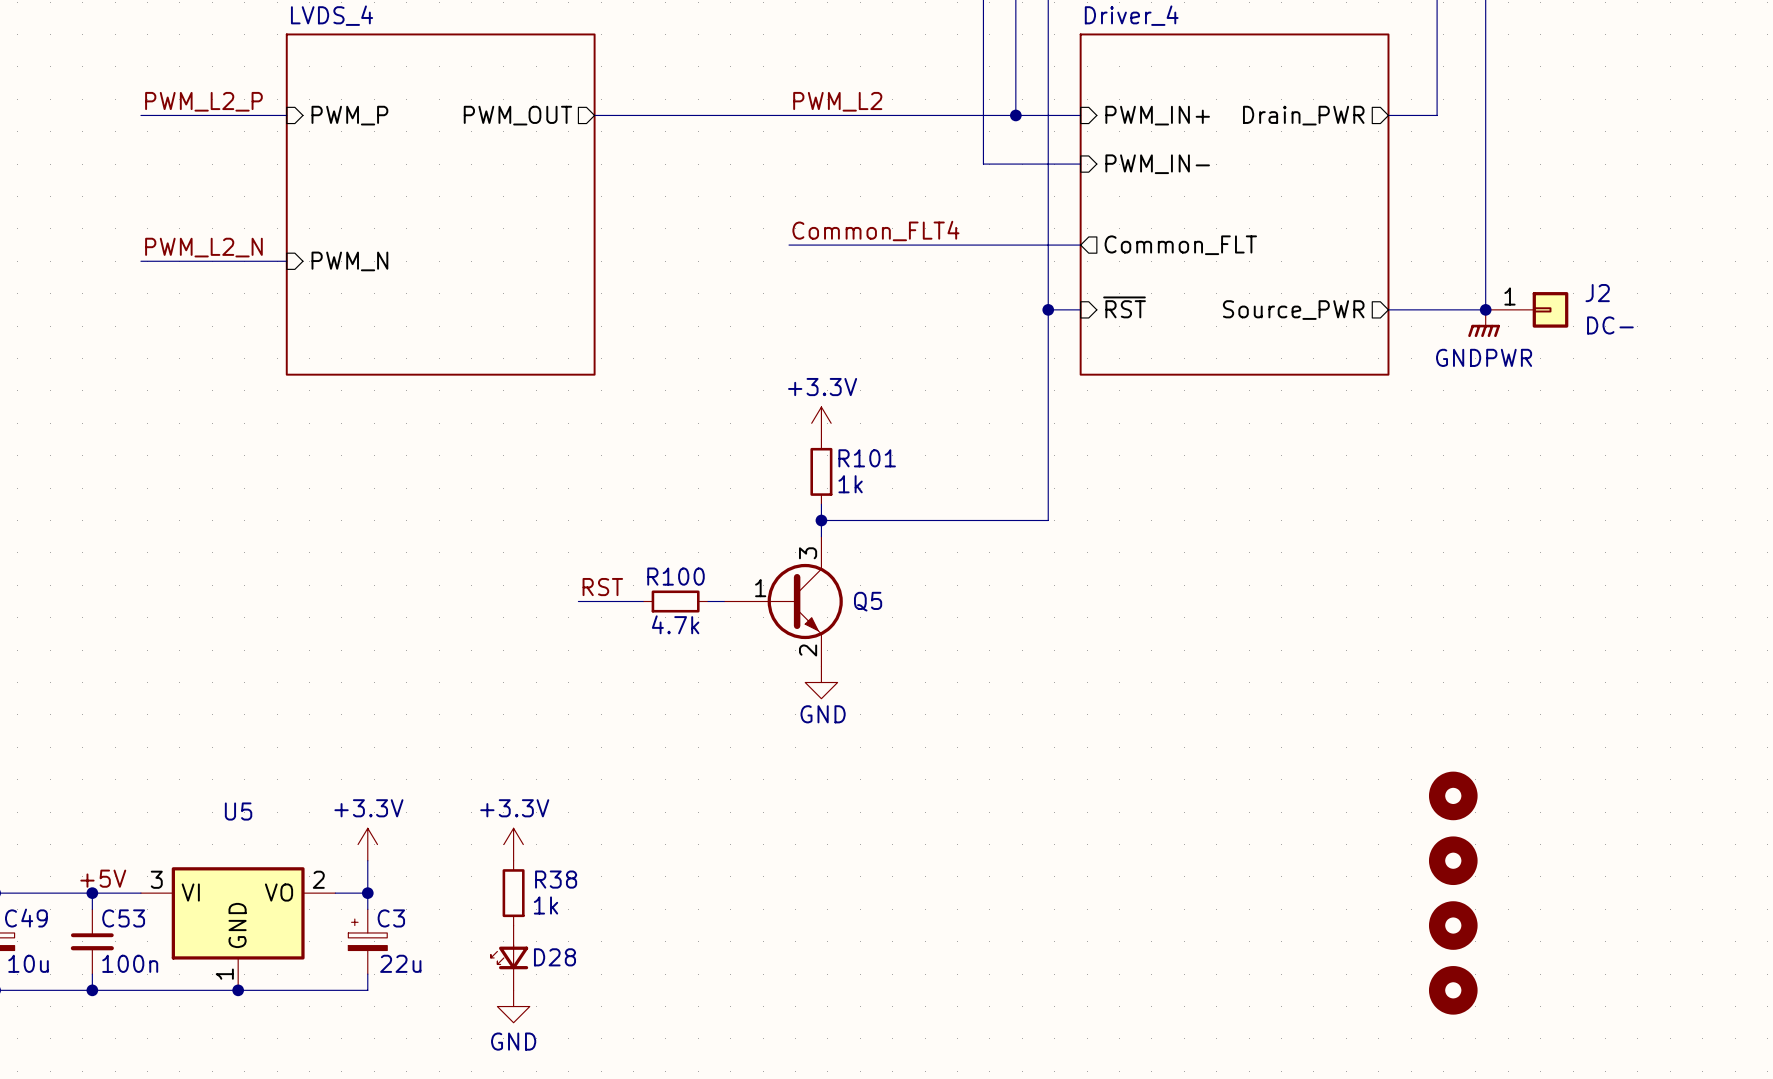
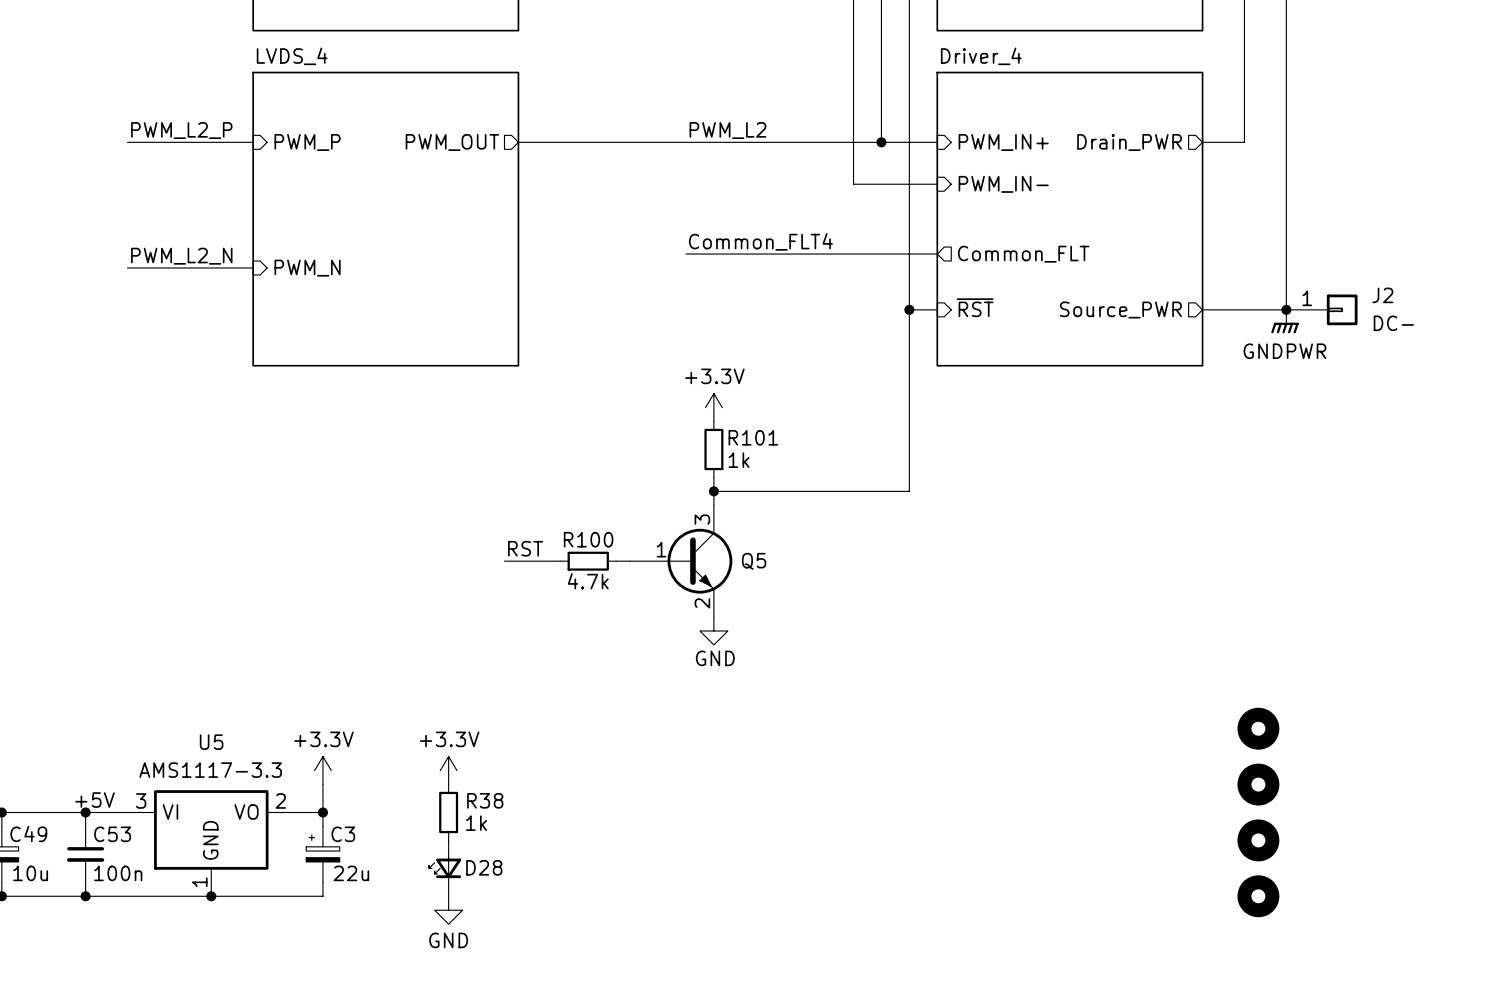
U5 value: none -> AMS1117-3.3 (210, 770)

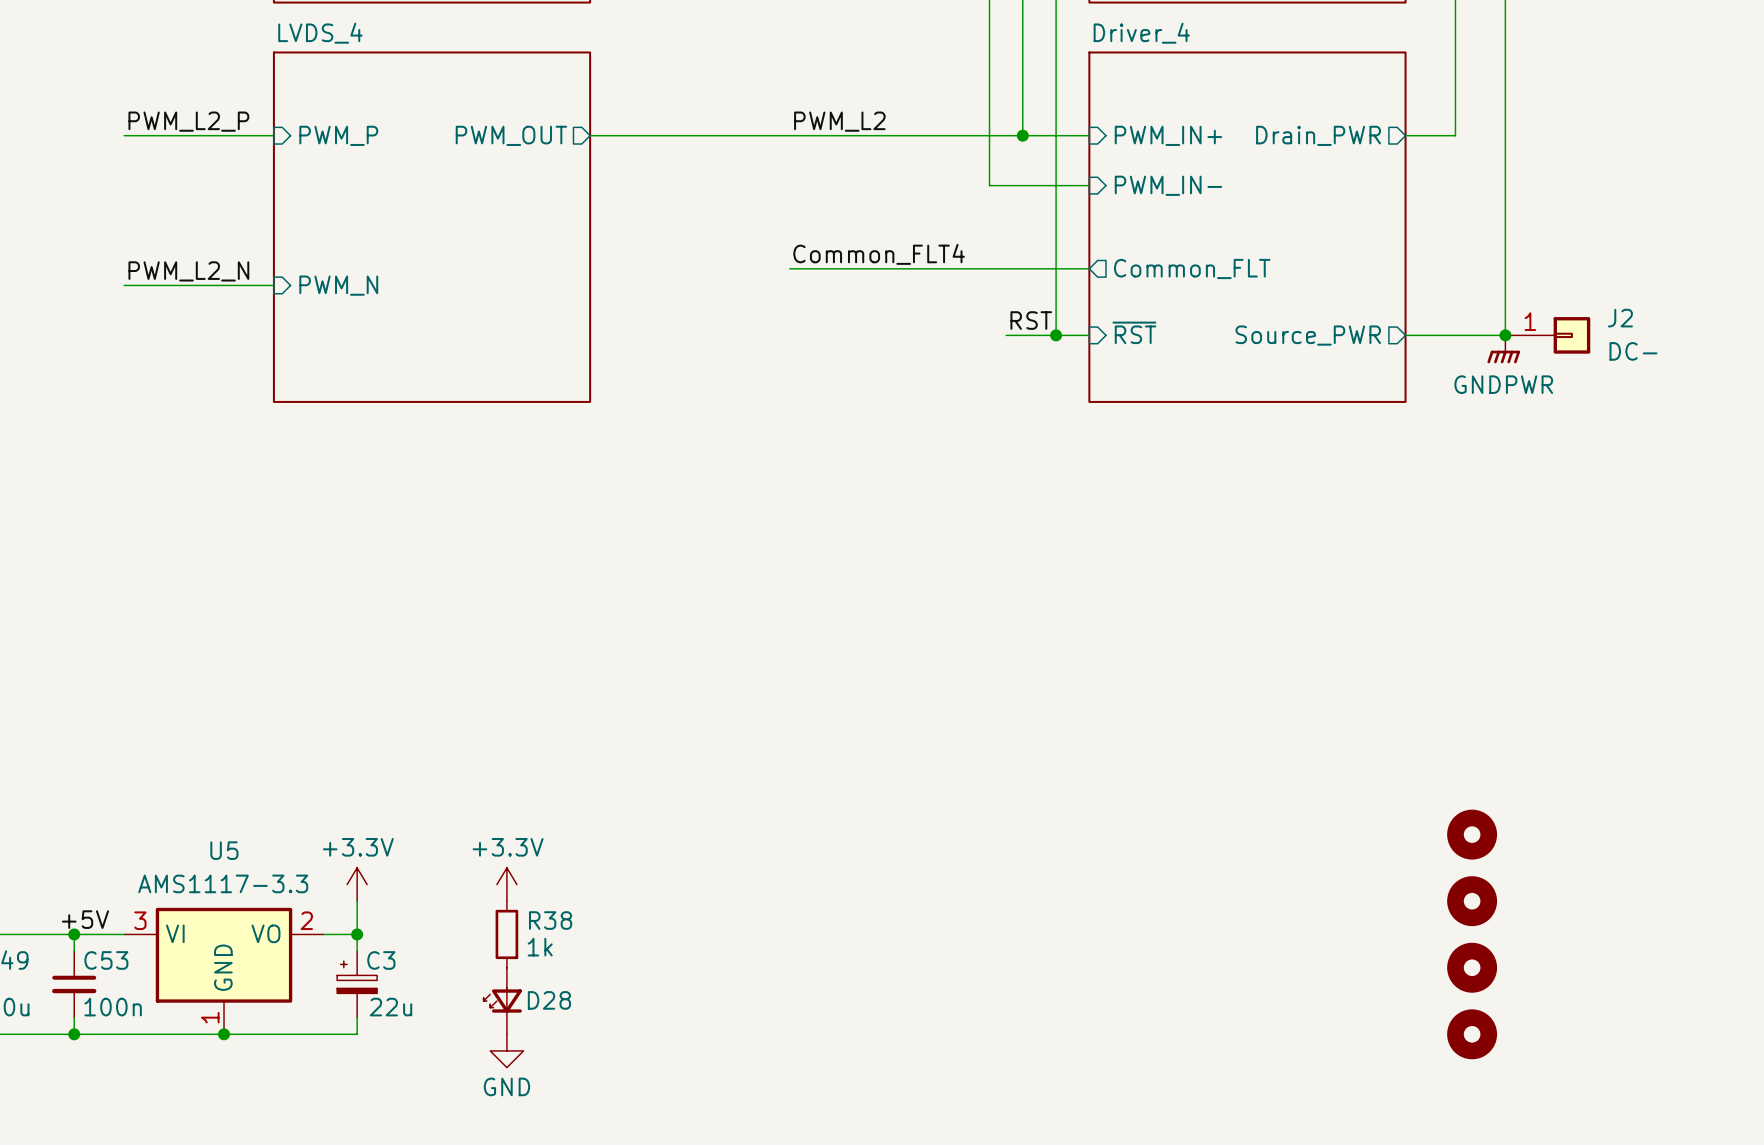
label: none -> RST (1031, 320)
wire: (909, 309) (909, 491) (713, 491) -> (1056, 335) (1006, 335)
power symbol: +3.3V (713, 407) -> none
R101: 1k (713, 449) -> none
wire: (713, 477) (713, 505) -> none
junction: (713, 491) -> none
label: RST (525, 548) -> none
wire: (504, 561) (560, 561) -> none
R100: 4.7k (588, 561) -> none
wire: (616, 561) (630, 561) -> none
Q5: (681, 561) -> none
power symbol: GND (713, 630) -> none

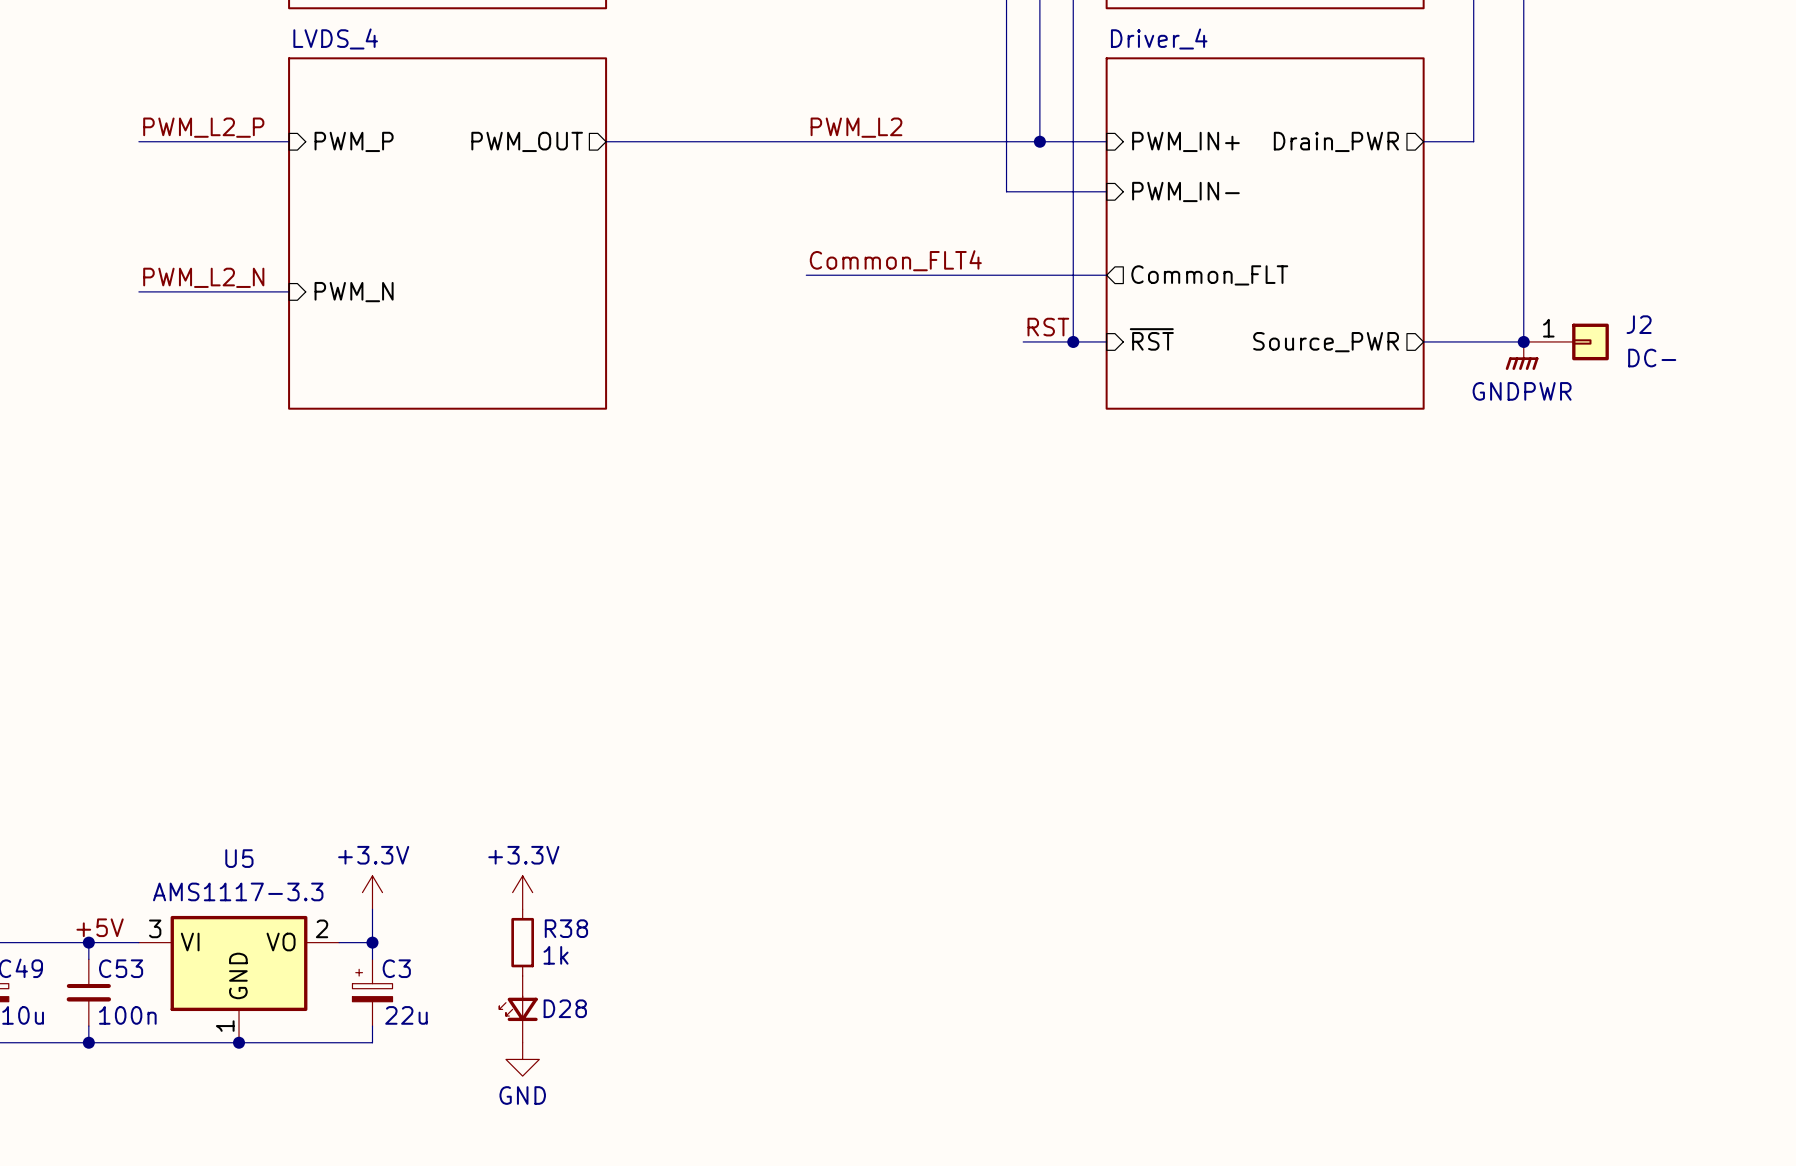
part: (1472, 834) -> none
part: (1472, 901) -> none
part: (1472, 967) -> none
part: (1472, 1034) -> none

